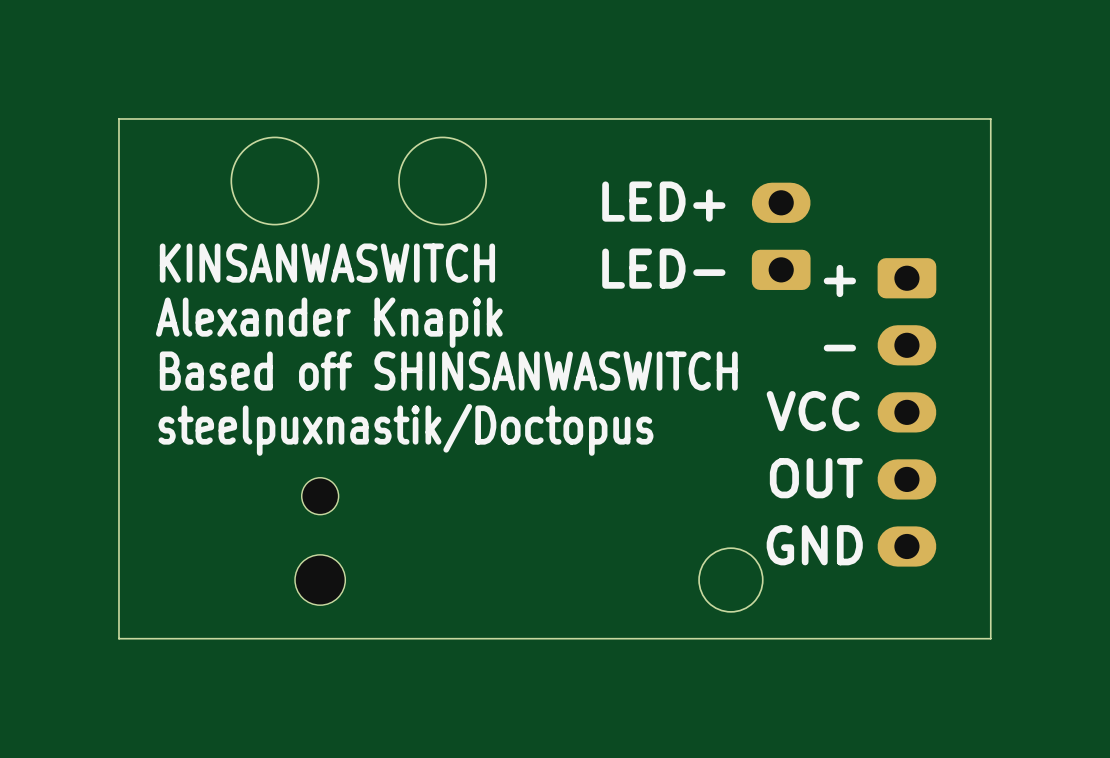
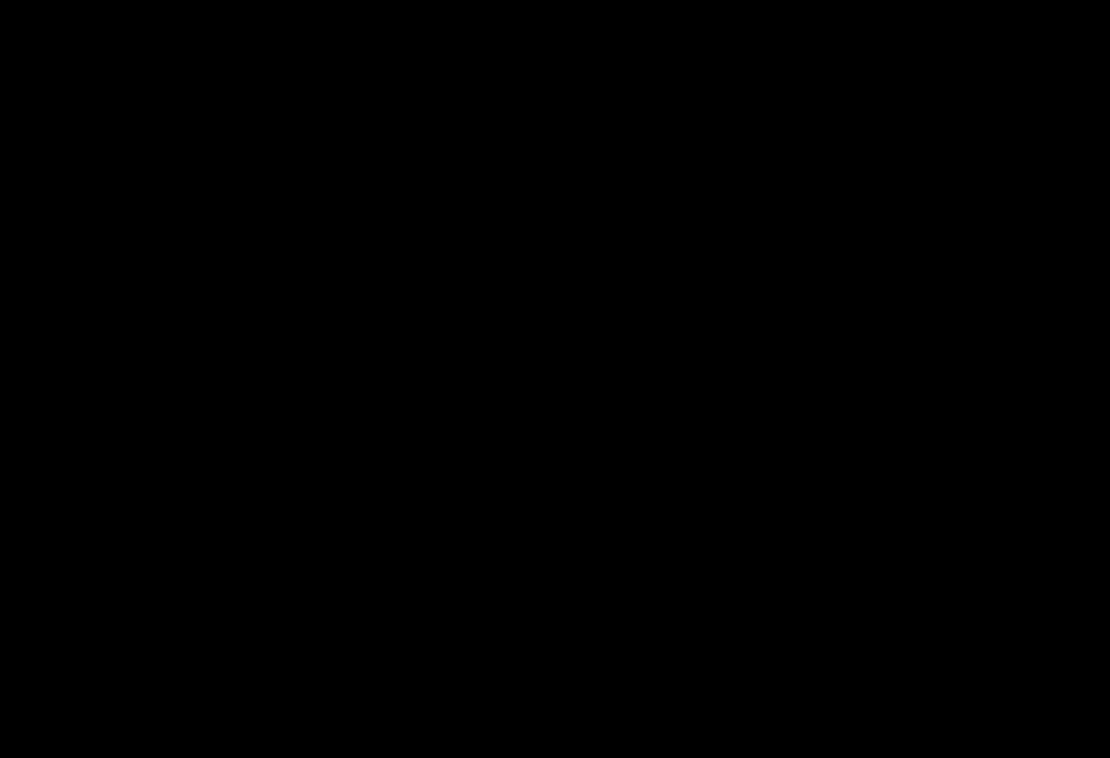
board edge: (990, 118) (118, 118) (118, 638) (990, 638) (990, 118) -> none
round board edge: [230, 136, 320, 226] -> none
round board edge: [398, 136, 487, 226] -> none
text: LED+ (663, 201) -> none
part: (781, 236) -> none
text: KINSANWASWITCH (327, 263) -> none
text: LED- (663, 268) -> none
text: + (839, 280) -> none
text: Alexander Knapik (329, 322) -> none
text: - (839, 348) -> none
text: Based off SHINSANWASWITCH (448, 371) -> none
text: VCC (813, 411) -> none
part: (906, 412) -> none
text: steelpuxnastik/Doctopus (405, 429) -> none
text: OUT (816, 478) -> none
part: (320, 541) -> none
text: GND (814, 545) -> none
round board edge: [698, 547, 764, 613] -> none

